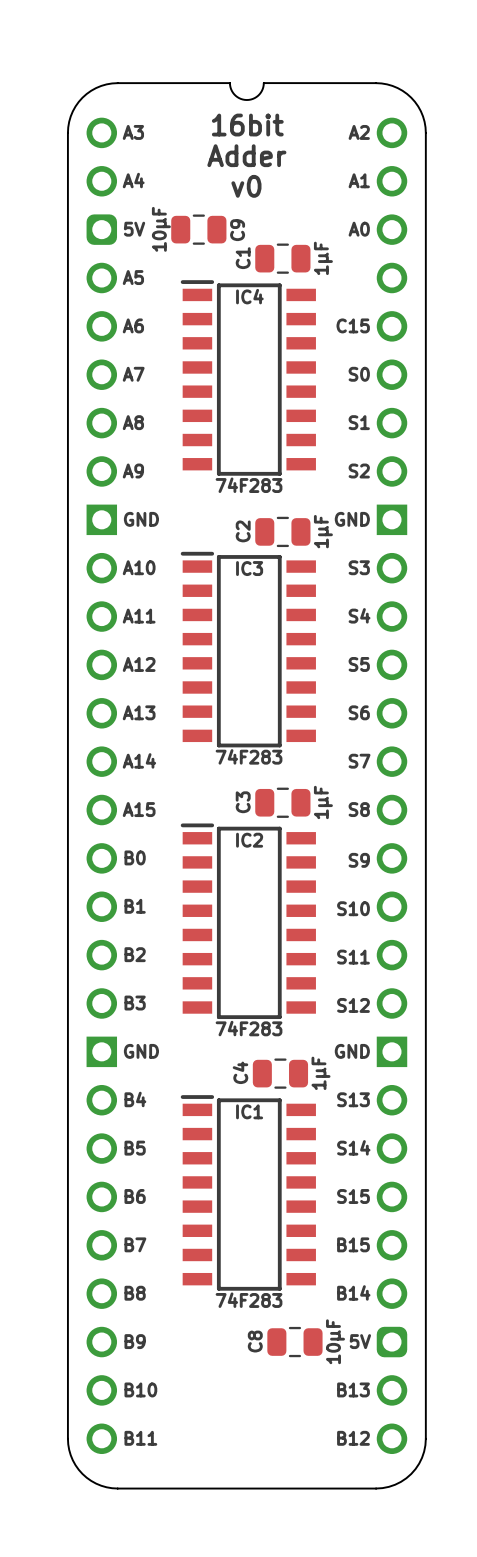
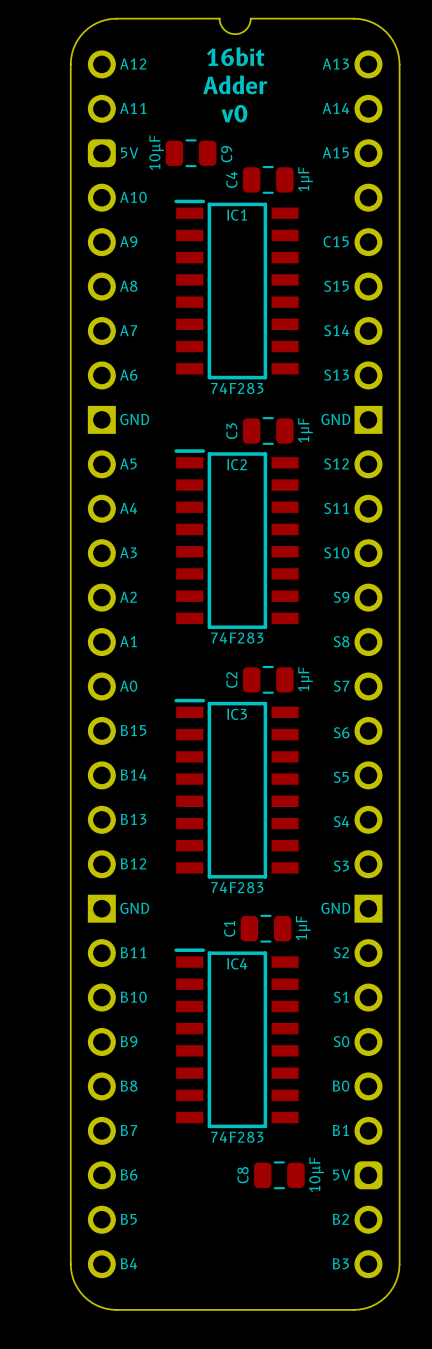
text: A3 (133, 132) -> A12 (133, 63)
text: A2 (359, 132) -> A13 (335, 63)
text: A4 (133, 180) -> A11 (133, 108)
text: A1 (359, 180) -> A14 (335, 108)
text: A0 (359, 229) -> A15 (335, 152)
C1 name: C1 (243, 258) -> C4 (231, 179)
text: A5 (133, 277) -> A10 (133, 197)
IC4 name: IC4 (249, 296) -> IC1 (237, 215)
text: A6 (133, 325) -> A9 (128, 241)
text: A7 (133, 374) -> A8 (128, 286)
text: S0 (359, 374) -> S15 (336, 286)
text: A8 (133, 422) -> A7 (128, 330)
text: S1 (359, 422) -> S14 (336, 330)
text: A9 (133, 471) -> A6 (128, 375)
text: S2 (359, 471) -> S13 (336, 375)
C2 name: C2 (243, 531) -> C3 (231, 431)
text: A10 (139, 567) -> A5 (128, 463)
text: S3 (359, 567) -> S12 (336, 463)
IC3 name: IC3 (249, 568) -> IC2 (237, 464)
text: S4 (359, 615) -> S11 (336, 508)
text: A11 (139, 616) -> A4 (128, 508)
text: A12 (139, 664) -> A3 (128, 552)
text: S5 (359, 664) -> S10 (336, 552)
text: A13 (139, 712) -> A2 (128, 597)
text: S6 (359, 712) -> S9 (341, 597)
text: A14 (139, 760) -> A1 (128, 641)
text: S7 (359, 761) -> S8 (341, 641)
C3 name: C3 (243, 802) -> C2 (231, 679)
text: A15 (139, 809) -> A0 (128, 686)
text: S8 (359, 809) -> S7 (341, 686)
IC2 name: IC2 (249, 840) -> IC3 (237, 714)
text: B0 (135, 857) -> B15 (133, 730)
text: S9 (359, 860) -> S6 (341, 732)
text: B1 (135, 906) -> B14 (133, 774)
text: S10 (353, 908) -> S5 (341, 777)
text: B2 (135, 954) -> B13 (133, 819)
text: S11 (353, 957) -> S4 (341, 821)
text: B3 (135, 1003) -> B12 (133, 863)
text: S12 (353, 1005) -> S3 (341, 866)
C4 name: C4 (240, 1072) -> C1 (229, 928)
text: B4 (135, 1099) -> B11 (133, 952)
text: S13 (353, 1099) -> S2 (341, 952)
IC1 name: IC1 (249, 1111) -> IC4 (237, 963)
text: S14 (353, 1147) -> S1 (341, 997)
text: B5 (135, 1148) -> B10 (133, 997)
text: B6 (135, 1196) -> B9 (129, 1041)
text: S15 (353, 1196) -> S0 (341, 1041)
text: B7 (135, 1244) -> B8 (129, 1086)
text: B15 (353, 1244) -> B0 (341, 1086)
text: B14 (353, 1292) -> B1 (340, 1130)
text: B8 (135, 1293) -> B7 (128, 1130)
text: B9 (135, 1341) -> B6 (129, 1174)
text: B10 (140, 1389) -> B5 (128, 1219)
text: B13 (353, 1389) -> B2 (340, 1219)
text: B11 (140, 1438) -> B4 (128, 1263)
text: B12 (353, 1438) -> B3 (340, 1263)

